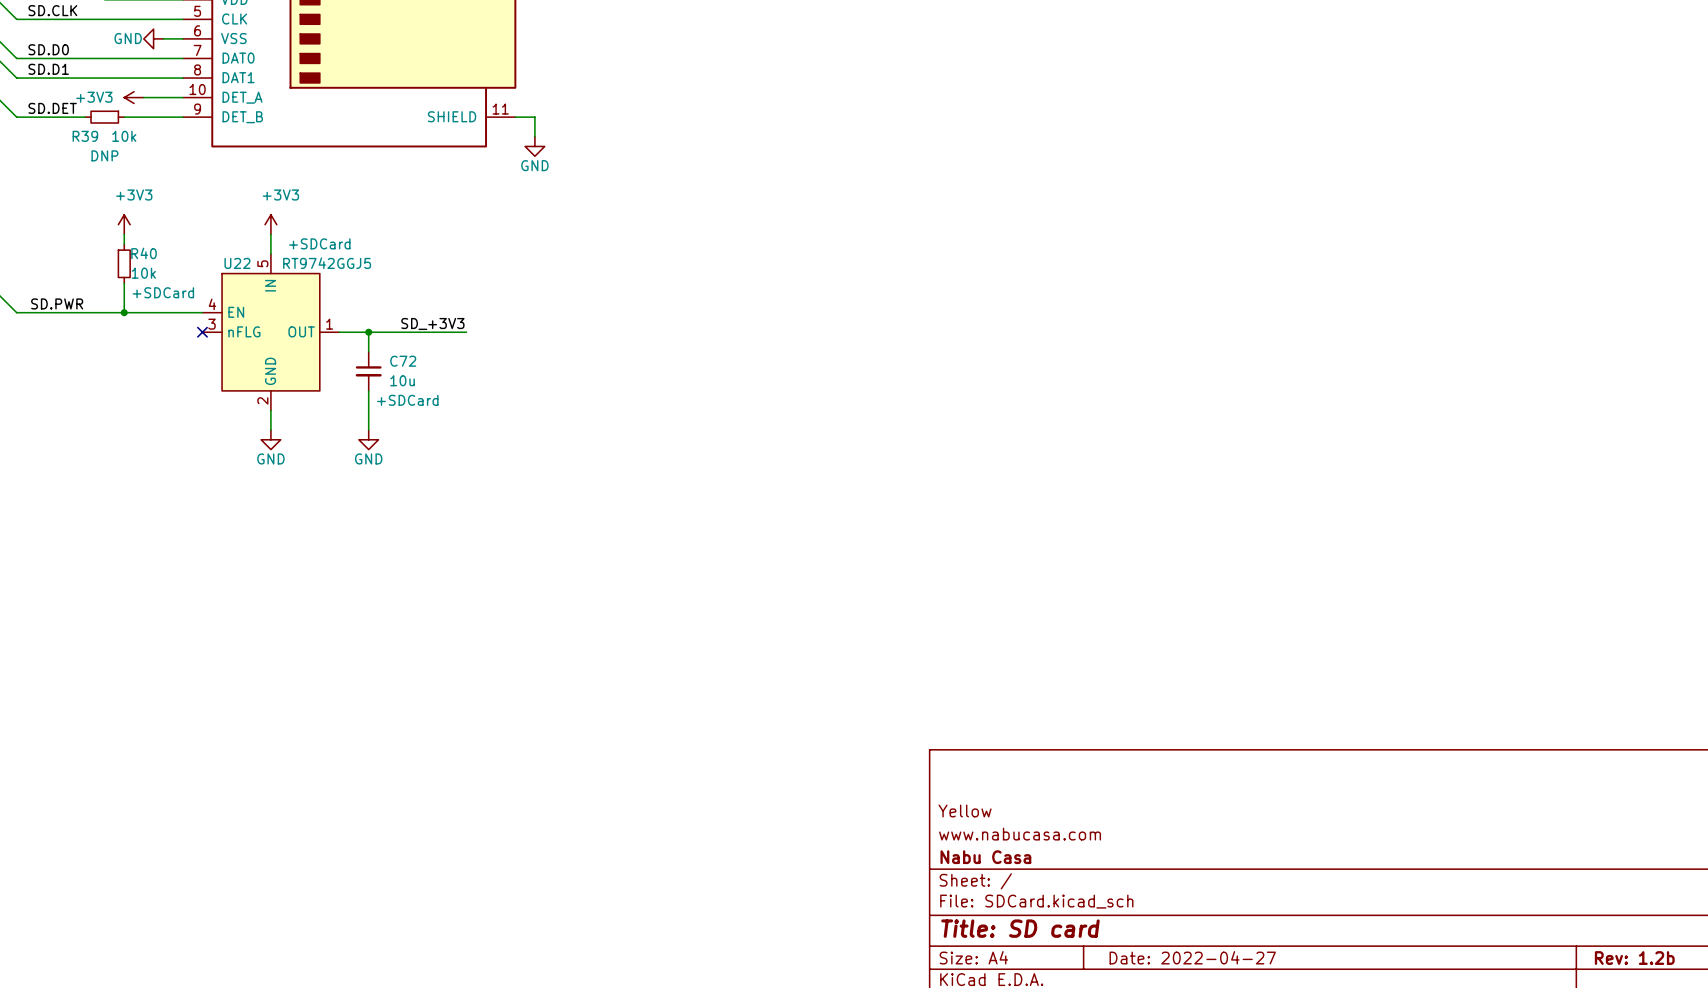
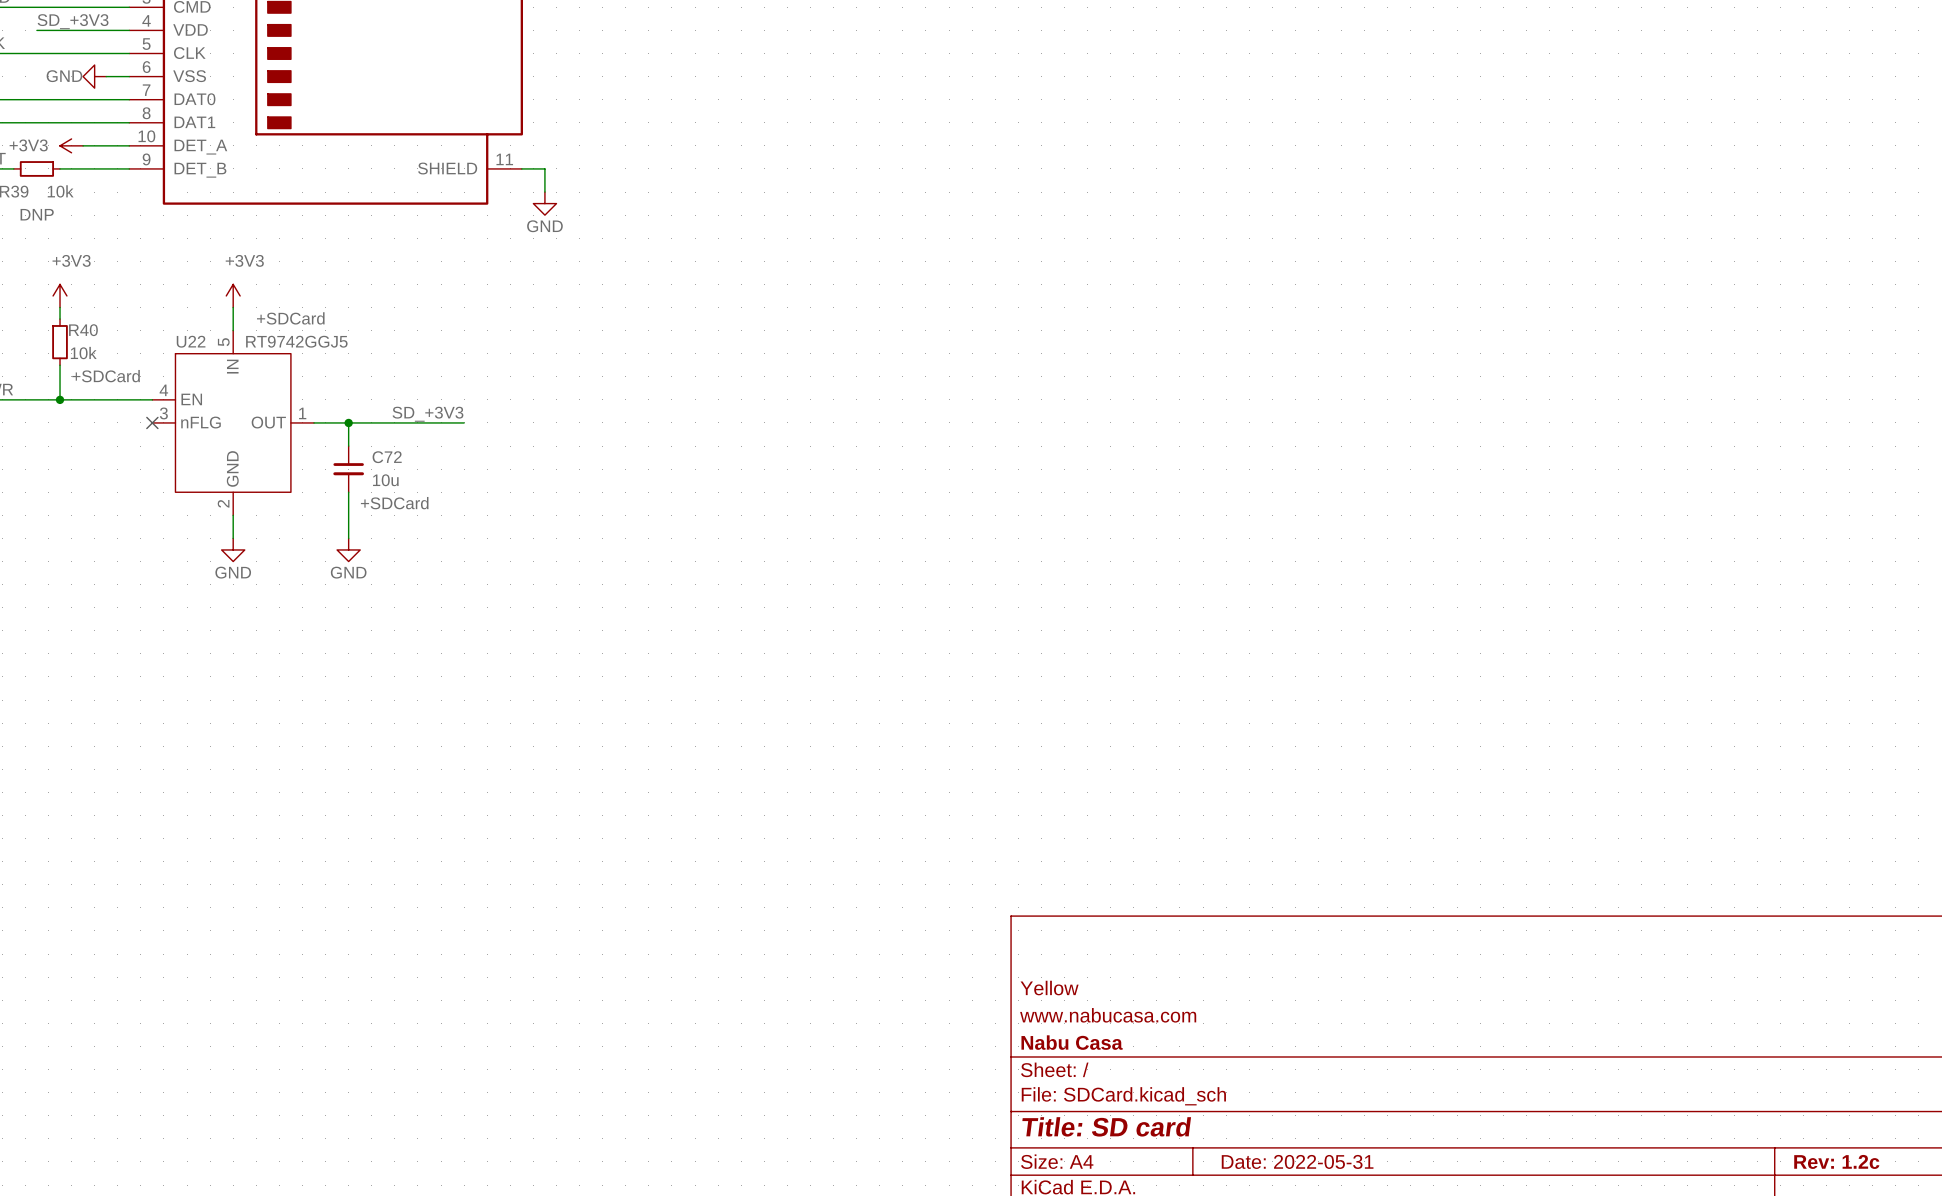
title block: Date: 2022-04-27 (1192, 957) -> Date: 2022-05-31 (1297, 1161)
title block: Rev: 1.2b (1634, 958) -> Rev: 1.2c (1836, 1161)

